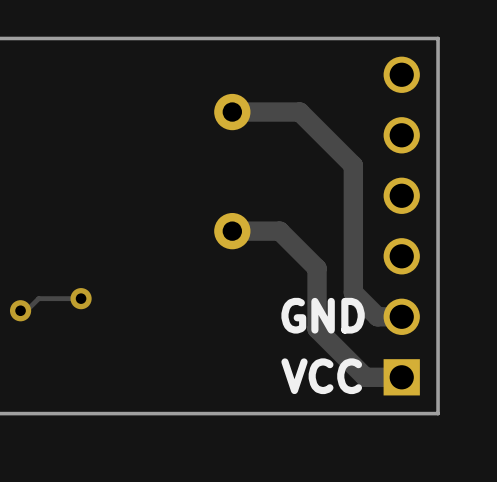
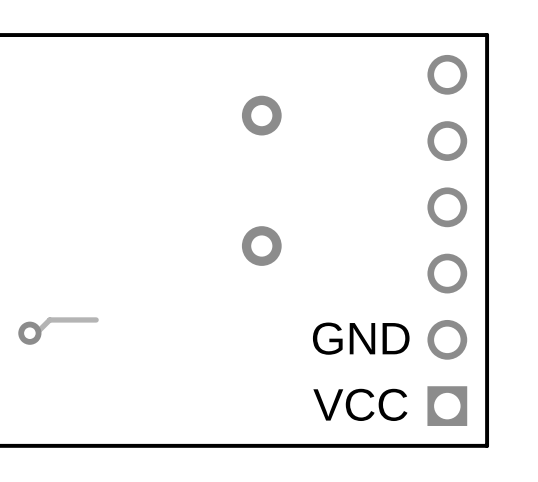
track: (232, 112) (299, 112) (353, 165) (353, 292) (377, 316) (401, 316) -> none
track: (232, 231) (279, 231) (317, 268) (317, 328) (365, 377) (401, 377) -> none
via: (81, 298) -> none

